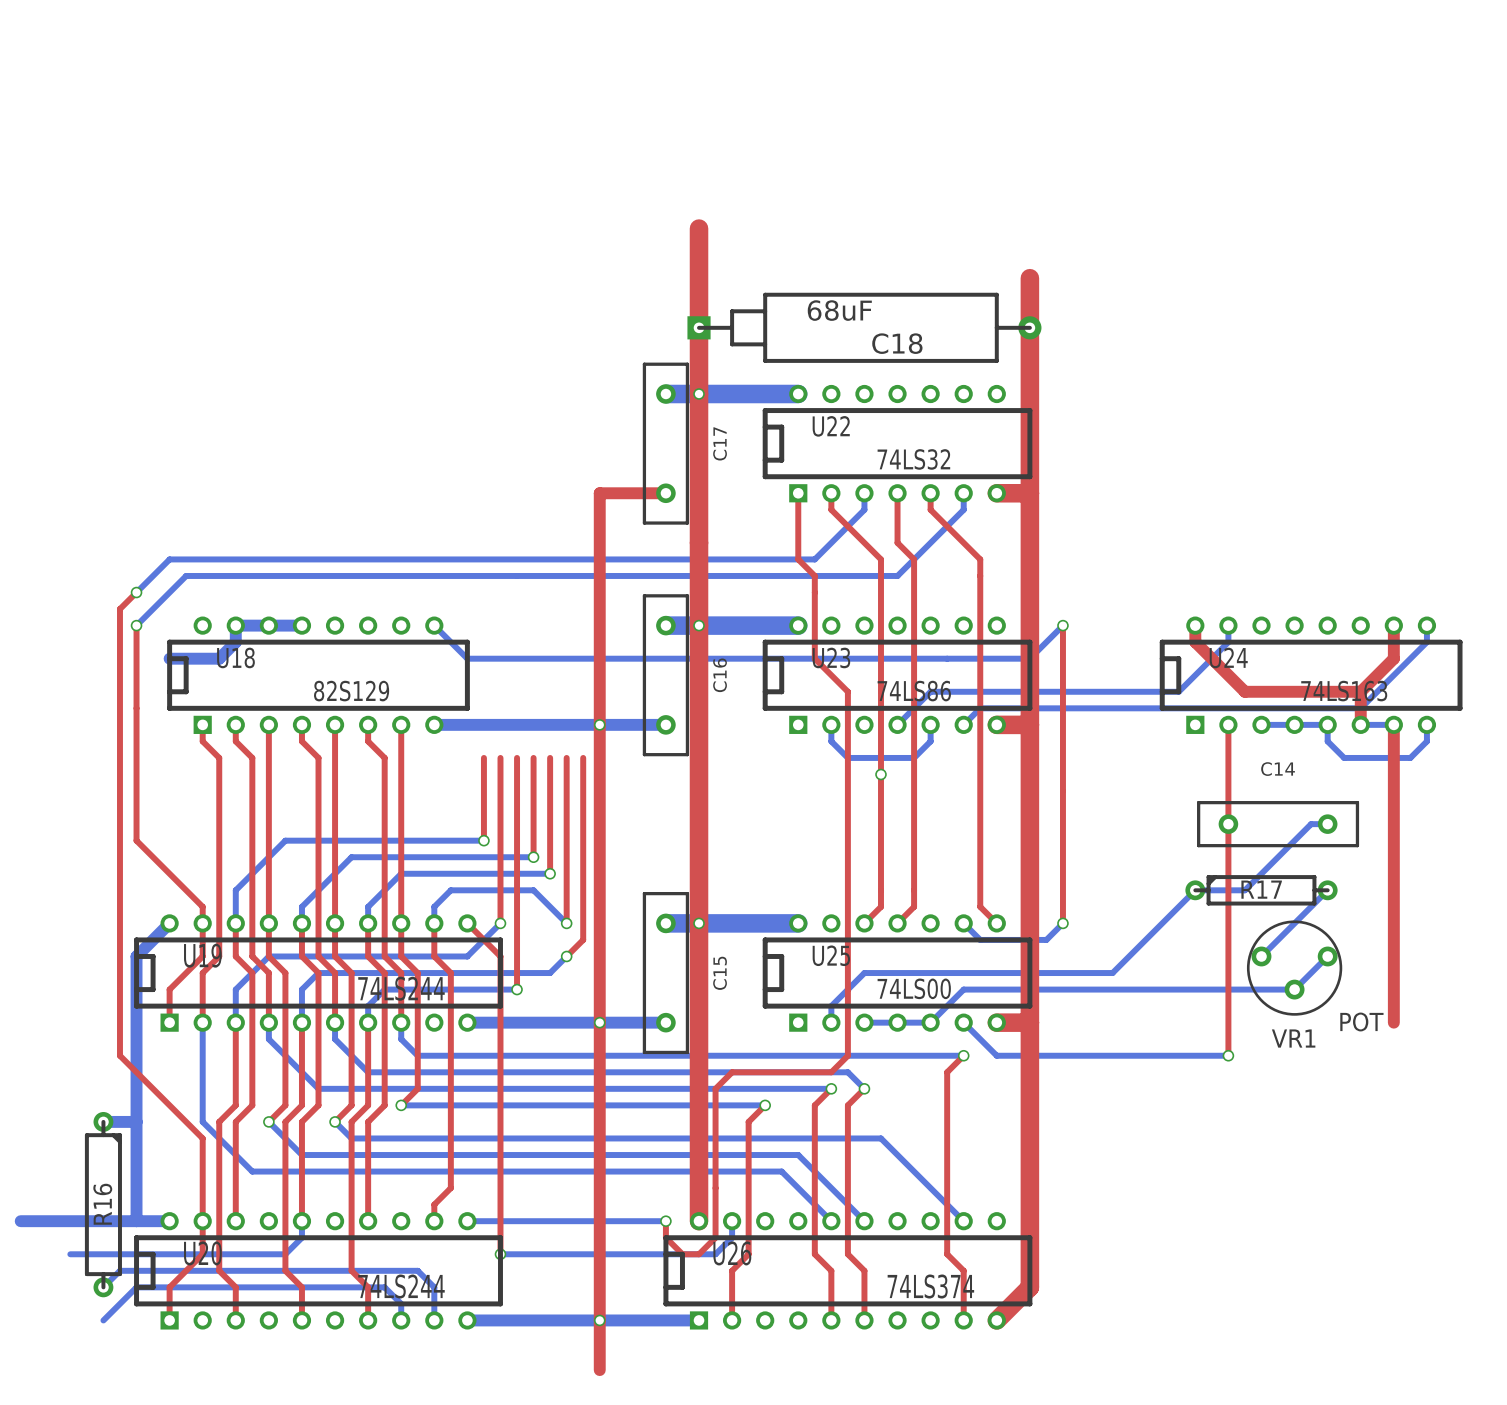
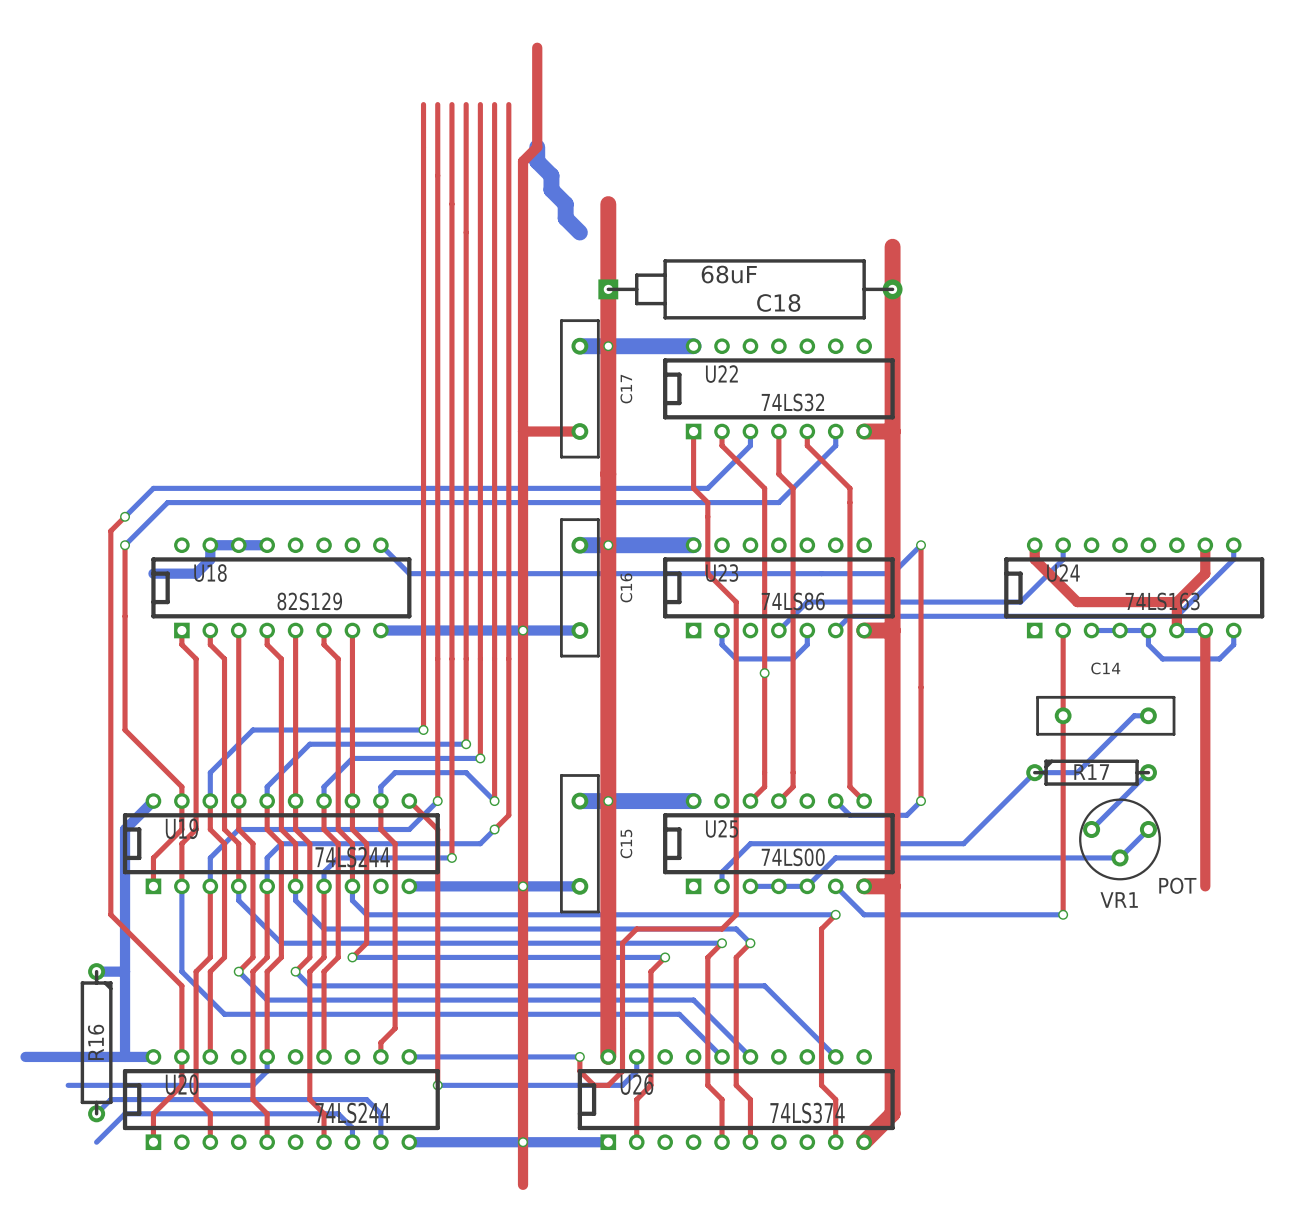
top track: none -> (537, 47) (537, 147) (523, 161) (523, 431)
top track: none -> (423, 104) (423, 658)
top track: none -> (437, 104) (437, 658)
top track: none -> (451, 104) (451, 658)
top track: none -> (466, 104) (466, 658)
top track: none -> (480, 104) (480, 658)
top track: none -> (494, 104) (494, 658)
top track: none -> (508, 104) (508, 658)
bottom track: none -> (537, 147) (537, 161) (551, 175) (551, 189) (565, 204) (565, 218) (579, 232)

